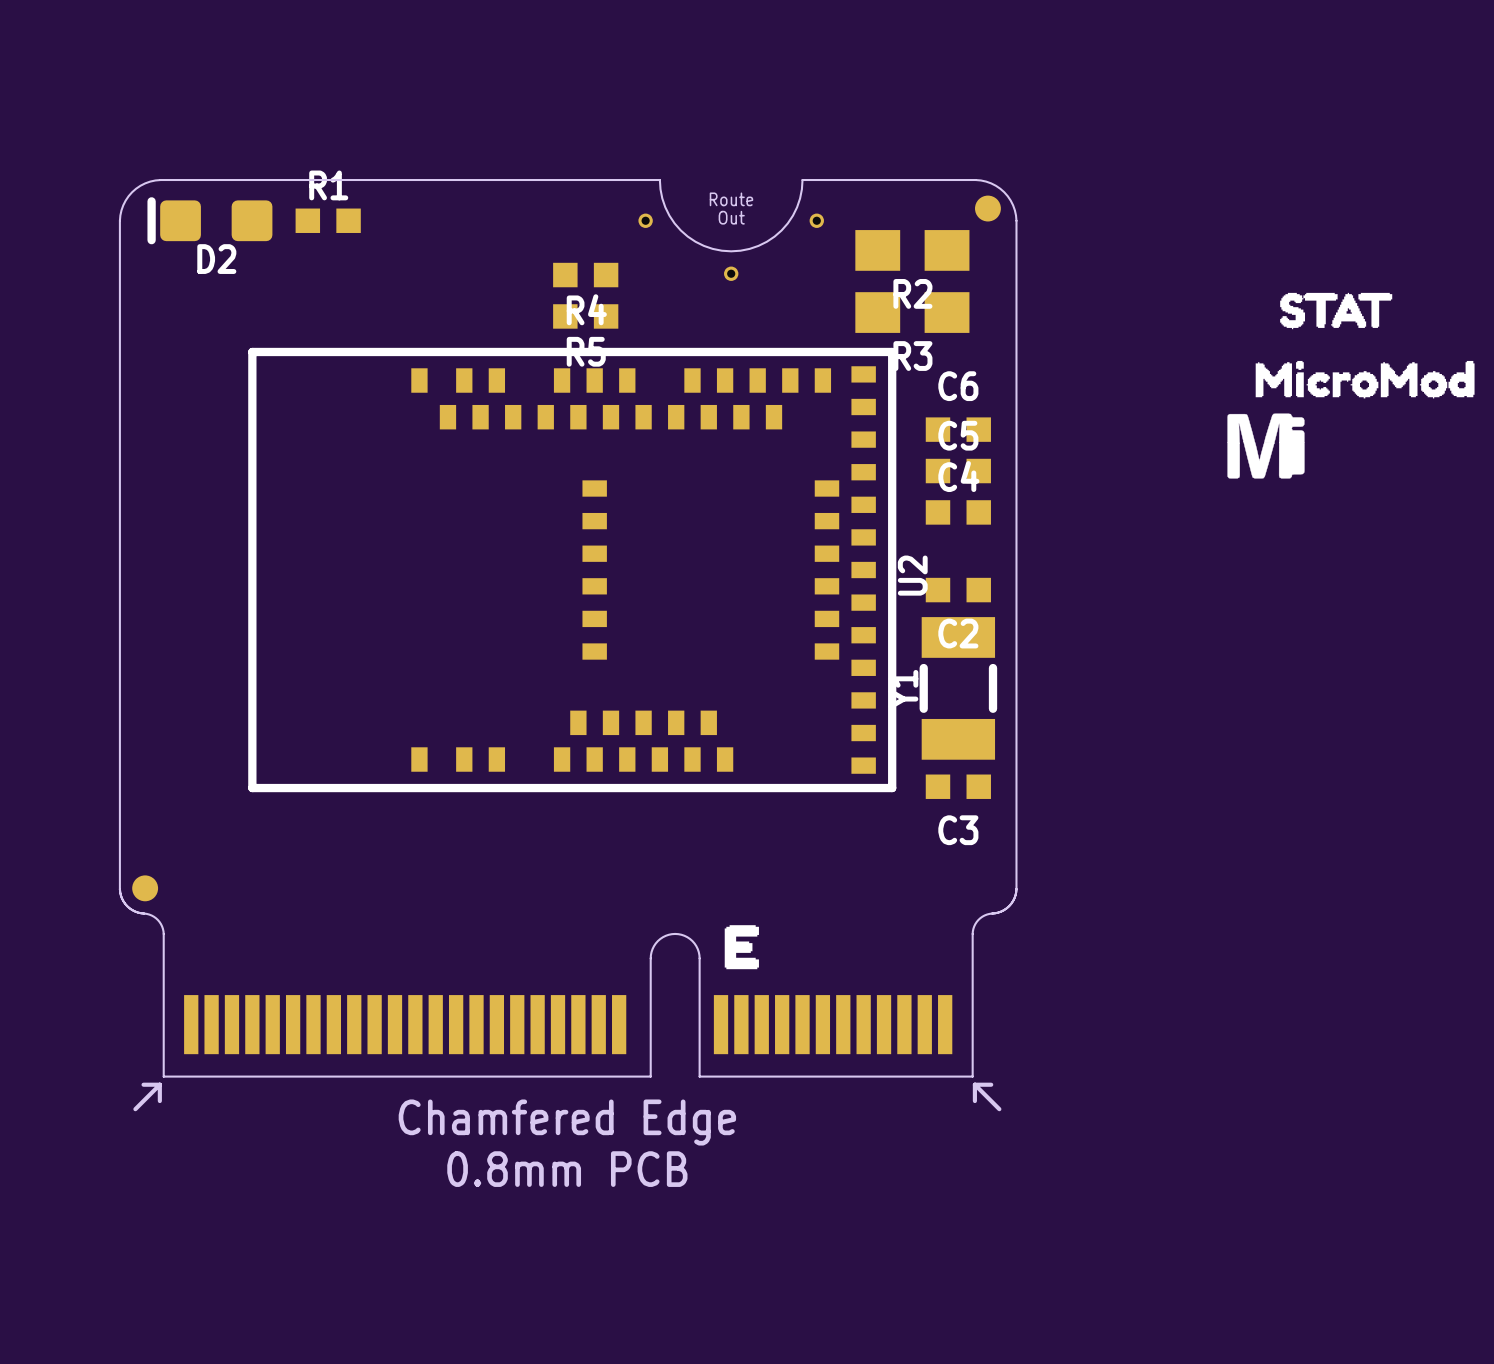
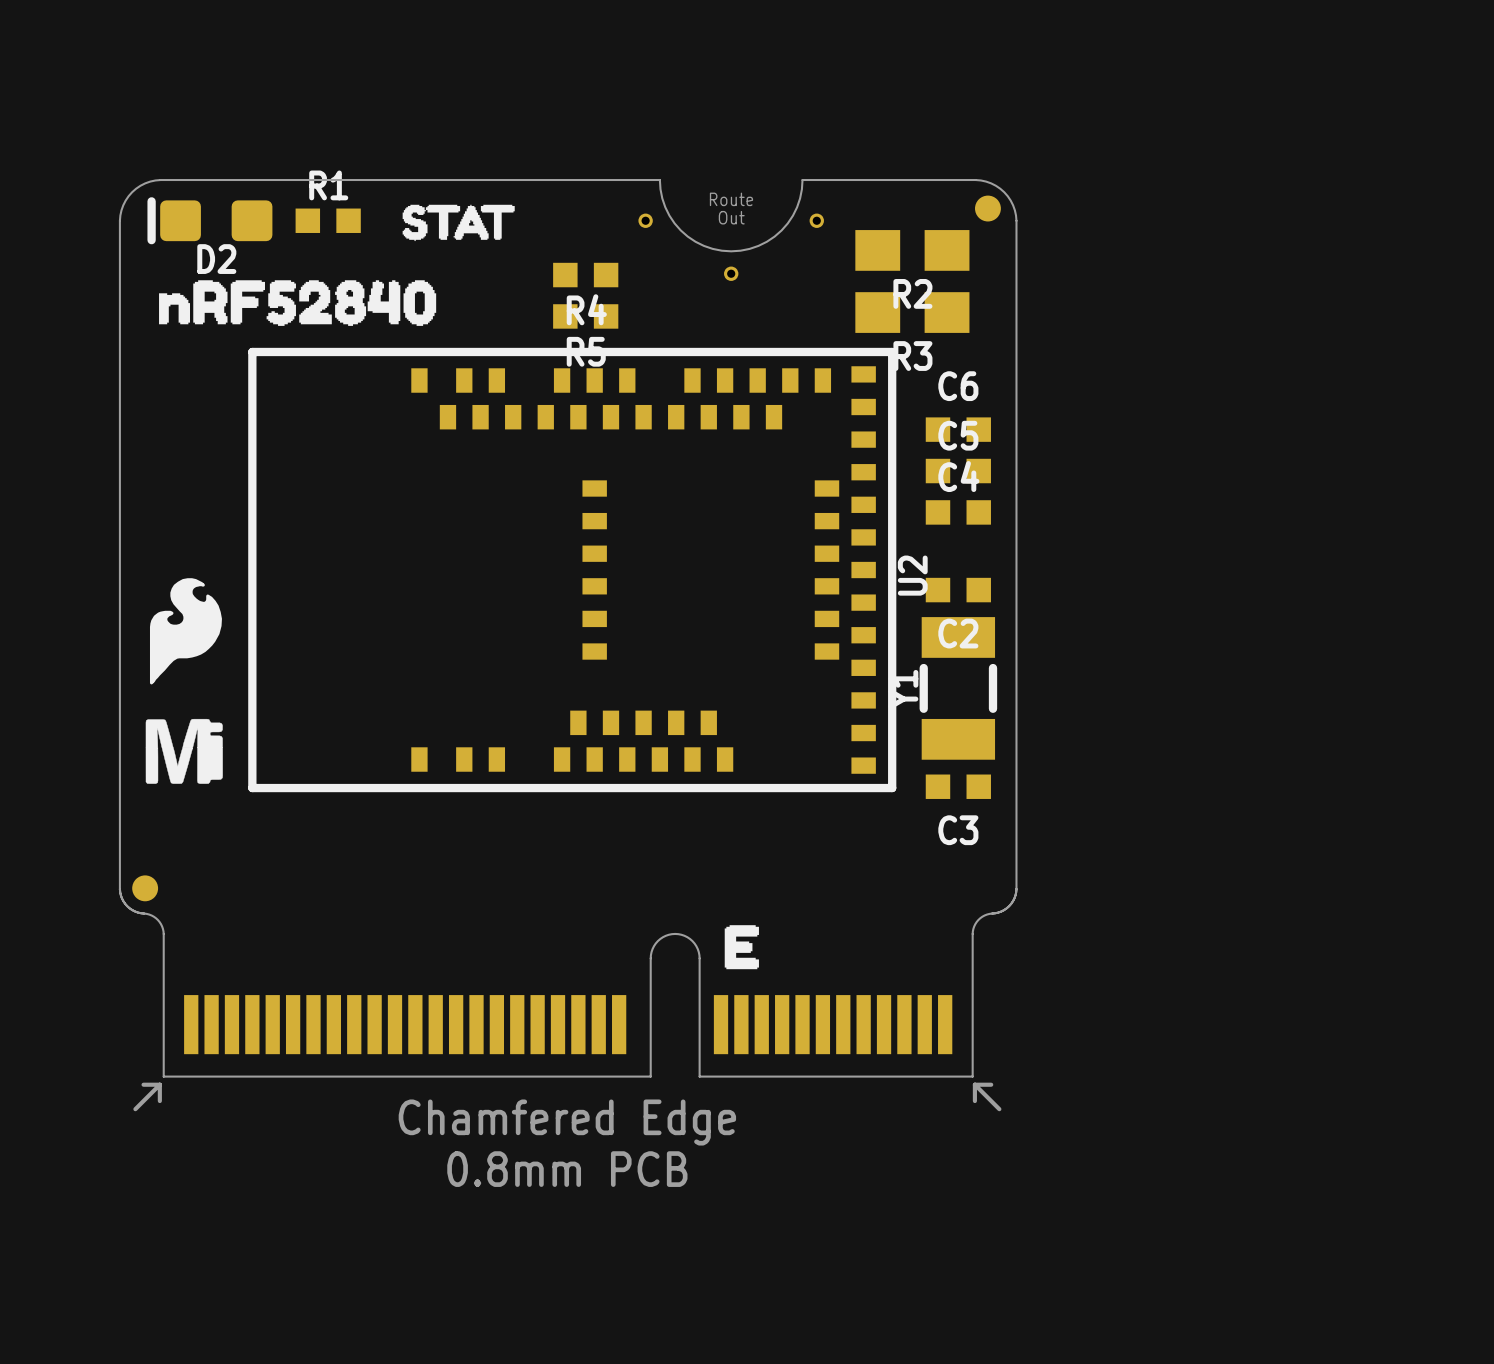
drawing: none -> [159, 280, 437, 326]
drawing position: (1336, 311) -> (458, 222)
drawing: [1227, 360, 1475, 479] -> none
drawing: none -> [145, 578, 223, 784]

